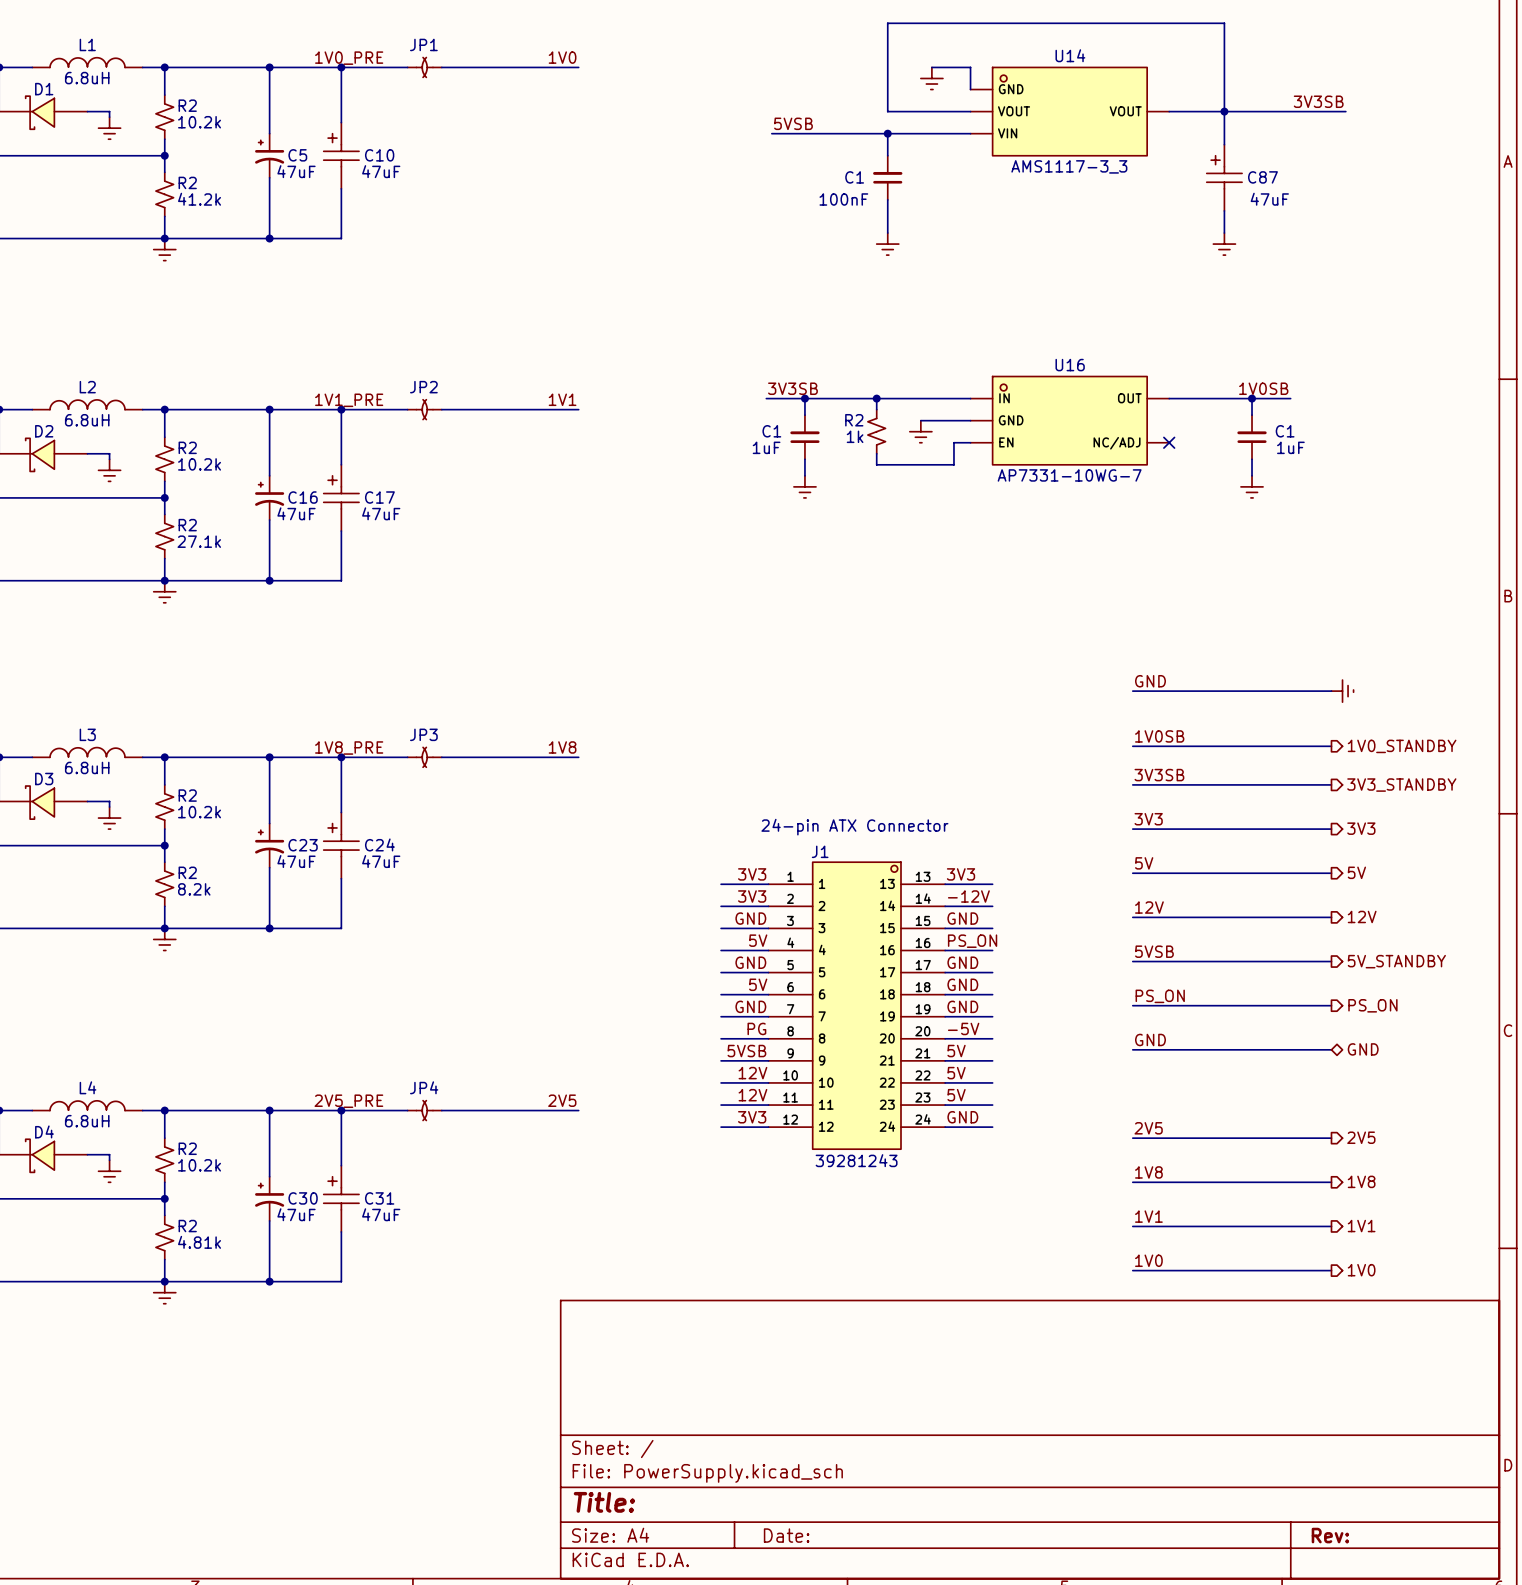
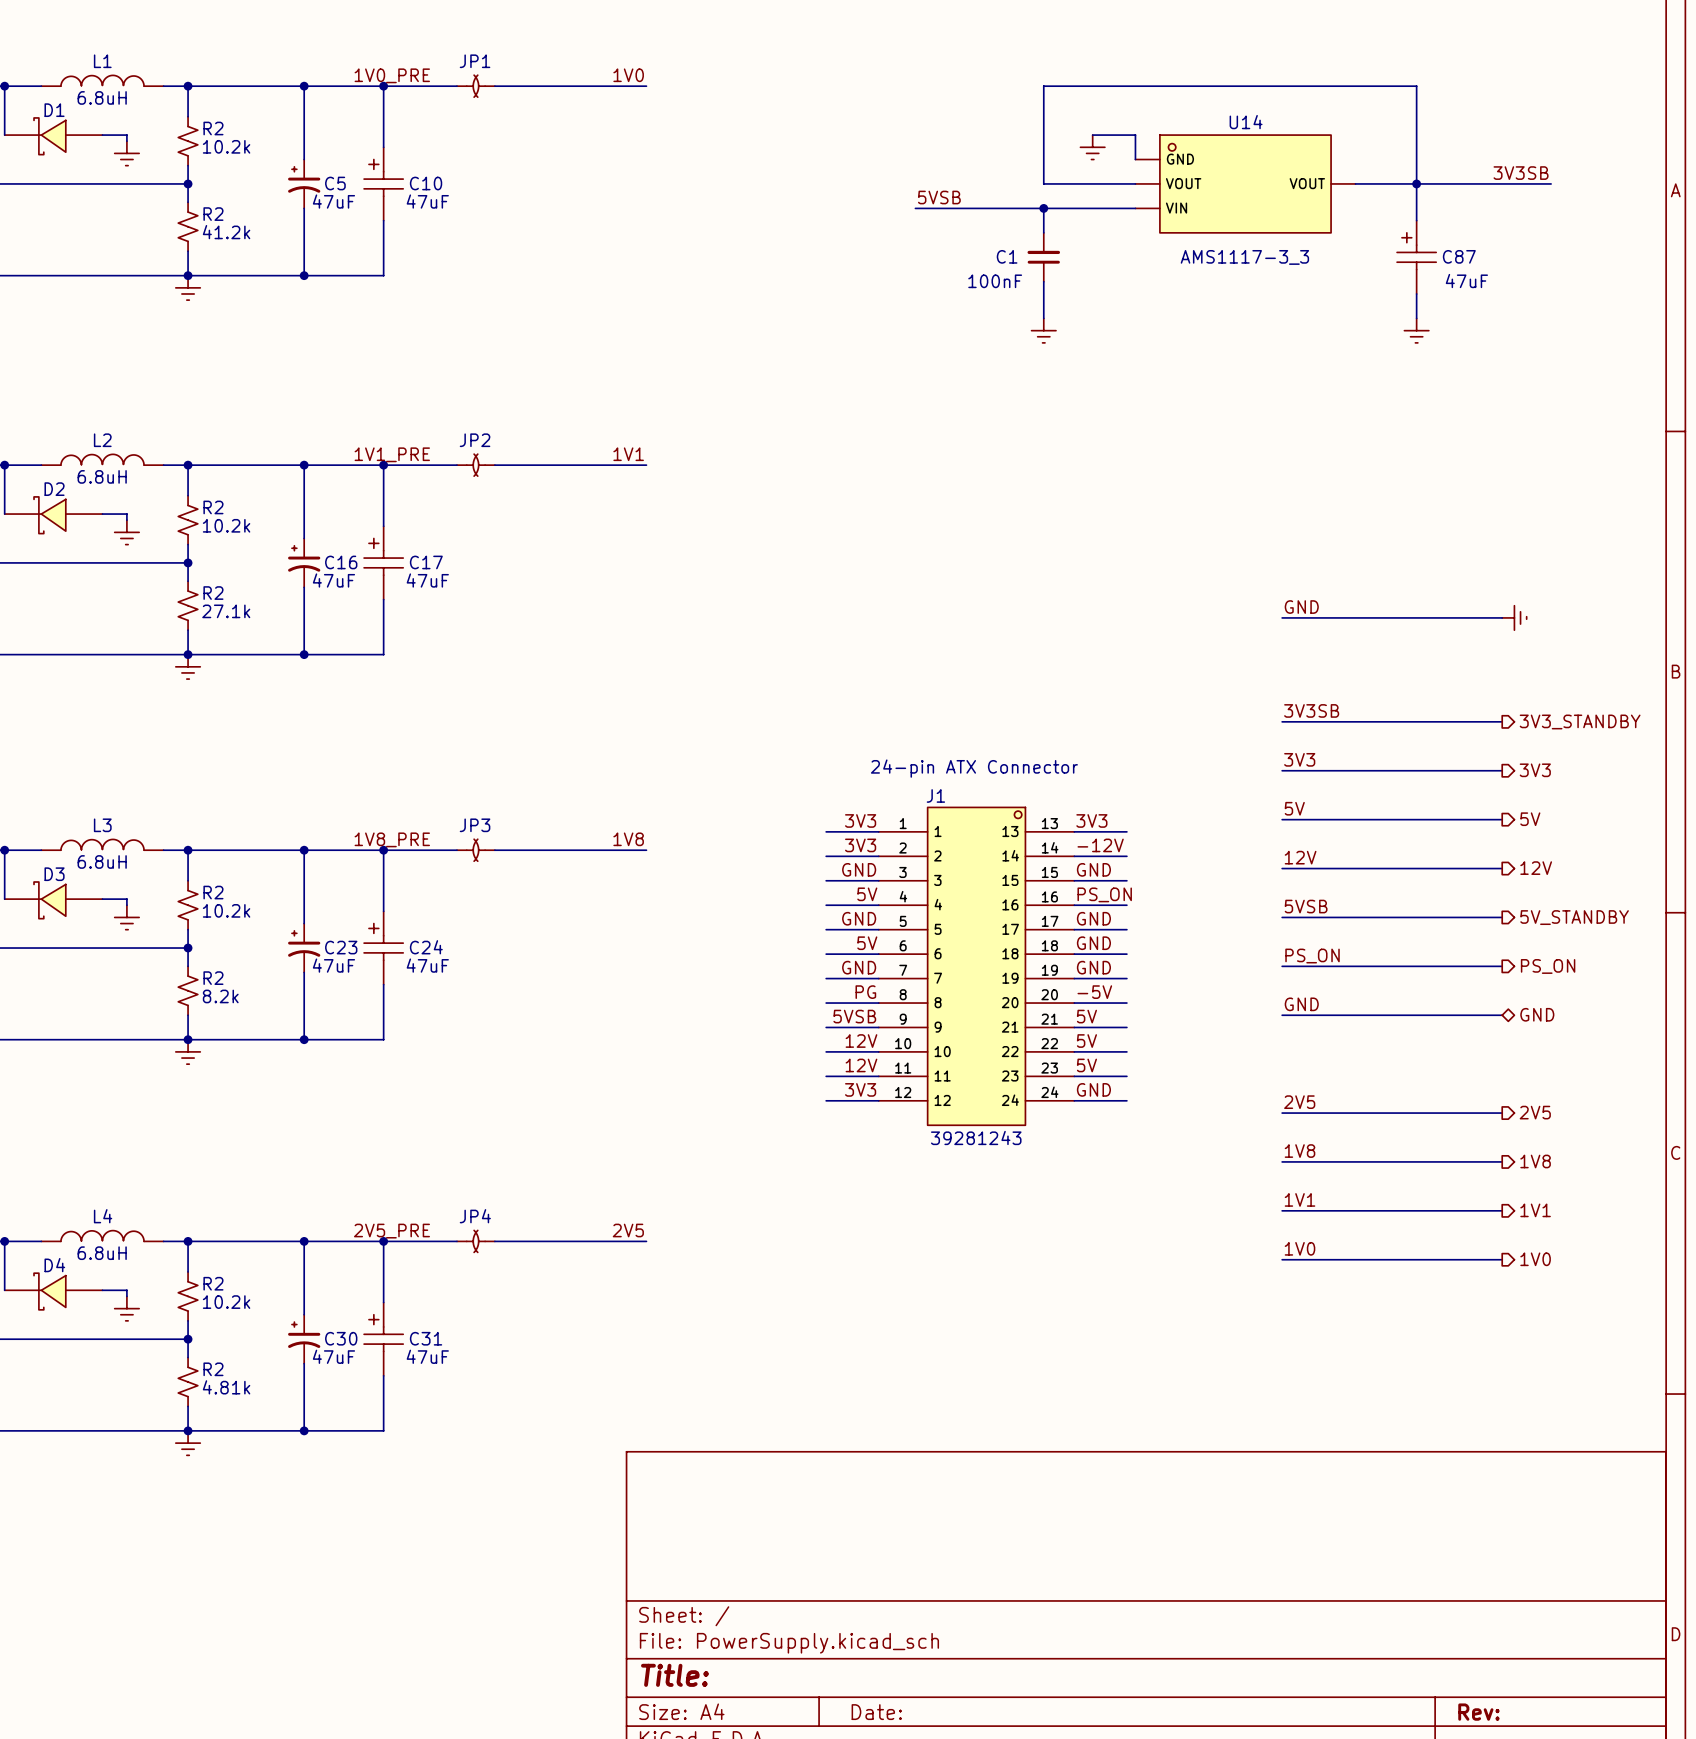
wire: (931, 67) (937, 67) -> (1135, 183) (1043, 183) (1043, 86)
wire: (970, 67) (970, 89) -> (1080, 86) (1416, 86) (1416, 220)
power symbol position: (931, 78) -> (1092, 147)
label position: 3V3SB (1318, 101) -> 3V3SB (1521, 173)
wire: (970, 111) (887, 111) (887, 23) (1224, 23) (1224, 144) -> none
U14 position: (1069, 111) -> (1245, 183)
wire: (1169, 111) (1345, 111) -> (1355, 183) (1551, 183)
junction: (1224, 111) -> none
label position: 5VSB (793, 123) -> 5VSB (939, 197)
wire: (771, 133) (970, 133) -> (915, 208) (1135, 208)
wire: (887, 133) (887, 155) -> (1043, 208) (1043, 232)
junction: (887, 133) -> none
junction: none -> (1416, 183)
U14 value position: AMS1117-3_3 (1069, 166) -> AMS1117-3_3 (1244, 257)
C1 position: (887, 177) -> (1043, 257)
junction: none -> (1043, 208)
C87 position: (1224, 177) -> (1416, 257)
wire: (887, 199) (887, 233) -> (1043, 281) (1043, 318)
wire: (1224, 210) (1224, 233) -> (1416, 293) (1416, 318)
power symbol position: (887, 244) -> (1043, 330)
power symbol position: (1224, 244) -> (1416, 330)
label: 3V3SB (792, 388) -> none
label: 1V0SB (1263, 388) -> none
wire: (766, 398) (970, 398) -> none
wire: (804, 398) (804, 415) -> none
junction: (804, 398) -> none
wire: (876, 398) (876, 409) -> none
junction: (876, 398) -> none
wire: (1169, 398) (1290, 398) -> none
wire: (1252, 398) (1252, 415) -> none
junction: (1252, 398) -> none
wire: (920, 420) (970, 420) -> none
U16: AP7331-10WG-7 (1069, 420) -> none
R2: 1k (876, 431) -> none
power symbol: (920, 431) -> none
C1: 1uF (804, 437) -> none
C1: 1uF (1252, 437) -> none
wire: (970, 442) (953, 442) (953, 464) (876, 464) (876, 453) -> none
no-connect mark: (1169, 442) -> none
wire: (804, 459) (804, 475) -> none
wire: (1252, 459) (1252, 475) -> none
power symbol: (804, 486) -> none
power symbol: (1252, 486) -> none
label: none -> GND (1301, 607)
power symbol: none -> (1514, 617)
label: none -> 3V3 (1299, 759)
label: GND (1150, 681) -> none
wire: (1132, 691) (1331, 691) -> (1282, 617) (1502, 617)
power symbol: (1342, 691) -> none
label: none -> 5V (1294, 808)
label: none -> 3V3 (860, 820)
label: none -> 3V3 (1091, 820)
label: 1V0SB (1159, 736) -> none
wire: (1132, 746) (1331, 746) -> none
hierarchical label: 1V0_STANDBY (1402, 746) -> none
label: none -> 3V3 (860, 845)
label: none -> GND (859, 869)
label: none -> GND (1093, 869)
label position: 3V3SB (1159, 775) -> 3V3SB (1311, 710)
wire: (1132, 784) (1331, 784) -> (1282, 721) (1502, 721)
hierarchical label position: 3V3_STANDBY (1401, 785) -> 3V3_STANDBY (1580, 721)
label: none -> 5V (867, 894)
label: none -> PS_ON (1104, 894)
label: none -> GND (859, 918)
label: none -> GND (1093, 918)
label: 3V3 (1148, 819) -> none
text position: 24-pin ATX Connector (854, 827) -> 24-pin ATX Connector (974, 768)
hierarchical label position: 3V3 (1361, 828) -> 3V3 (1535, 770)
wire: (1132, 829) (1331, 829) -> (1282, 770) (1502, 770)
label: none -> 5V (867, 943)
label: none -> GND (1093, 943)
label: none -> PS_ON (1312, 956)
label: none -> GND (859, 967)
label: none -> GND (1093, 967)
label: 5V (1144, 863) -> none
hierarchical label position: 5V (1356, 872) -> 5V (1530, 819)
wire: (1132, 873) (1331, 873) -> (1282, 819) (1502, 819)
label: 3V3 (752, 874) -> none
label: 3V3 (961, 874) -> none
wire: (721, 884) (768, 884) -> (826, 831) (878, 831)
wire: (945, 884) (992, 884) -> (1074, 831) (1126, 831)
label: 3V3 (752, 896) -> none
label position: -12V (968, 896) -> -12V (1100, 845)
label: none -> GND (1301, 1004)
wire: (721, 906) (768, 906) -> (826, 856) (878, 856)
wire: (945, 906) (992, 906) -> (1074, 856) (1126, 856)
label: none -> 5V (1086, 1016)
label position: 12V (1149, 907) -> 12V (1300, 857)
hierarchical label position: 12V (1362, 916) -> 12V (1536, 868)
wire: (1132, 917) (1331, 917) -> (1282, 868) (1502, 868)
label: GND (750, 918) -> none
label: GND (962, 918) -> none
wire: (721, 928) (768, 928) -> (826, 880) (878, 880)
wire: (945, 928) (992, 928) -> (1074, 880) (1126, 880)
label: none -> 12V (861, 1041)
label: none -> 5V (1086, 1041)
label: 5V (758, 940) -> none
label: PS_ON (972, 941) -> none
wire: (721, 950) (768, 950) -> (826, 905) (878, 905)
wire: (945, 950) (992, 950) -> (1074, 905) (1126, 905)
label: none -> 12V (861, 1065)
label: none -> 5V (1086, 1065)
label position: 5VSB (1154, 951) -> 5VSB (1306, 906)
wire: (1132, 961) (1331, 961) -> (1282, 917) (1502, 917)
hierarchical label position: 5V_STANDBY (1396, 961) -> 5V_STANDBY (1574, 917)
label: GND (750, 962) -> none
label: GND (962, 962) -> none
wire: (721, 972) (768, 972) -> (826, 929) (878, 929)
wire: (945, 972) (992, 972) -> (1074, 929) (1126, 929)
label: none -> 3V3 (860, 1089)
label: none -> GND (1093, 1089)
label: 5V (758, 984) -> none
label: GND (962, 984) -> none
wire: (721, 994) (768, 994) -> (826, 954) (878, 954)
wire: (945, 994) (992, 994) -> (1074, 954) (1126, 954)
label: PS_ON (1160, 996) -> none
J1 position: (856, 1005) -> (976, 966)
wire: (1132, 1005) (1331, 1005) -> (1282, 966) (1502, 966)
hierarchical label position: PS_ON (1372, 1005) -> PS_ON (1548, 966)
label: GND (750, 1006) -> none
label: GND (962, 1006) -> none
wire: (721, 1016) (768, 1016) -> (826, 978) (878, 978)
wire: (945, 1016) (992, 1016) -> (1074, 978) (1126, 978)
label position: PG (756, 1028) -> PG (865, 992)
label position: -5V (963, 1028) -> -5V (1094, 992)
wire: (721, 1038) (768, 1038) -> (826, 1003) (878, 1003)
wire: (945, 1038) (992, 1038) -> (1074, 1003) (1126, 1003)
label: GND (1150, 1039) -> none
wire: (1132, 1049) (1331, 1049) -> (1282, 1015) (1502, 1015)
hierarchical label position: GND (1363, 1049) -> GND (1537, 1014)
label position: 5VSB (746, 1051) -> 5VSB (854, 1016)
label: 5V (956, 1051) -> none
wire: (721, 1060) (768, 1060) -> (826, 1027) (878, 1027)
wire: (945, 1060) (992, 1060) -> (1074, 1027) (1126, 1027)
label: 12V (752, 1073) -> none
label: 5V (956, 1073) -> none
wire: (721, 1082) (768, 1082) -> (826, 1051) (878, 1051)
wire: (945, 1082) (992, 1082) -> (1074, 1051) (1126, 1051)
label: 12V (752, 1095) -> none
label: 5V (956, 1095) -> none
wire: (721, 1105) (768, 1105) -> (826, 1076) (878, 1076)
wire: (945, 1105) (992, 1105) -> (1074, 1076) (1126, 1076)
label: 3V3 (752, 1117) -> none
label: GND (962, 1117) -> none
wire: (721, 1127) (768, 1127) -> (826, 1100) (878, 1100)
wire: (945, 1127) (992, 1127) -> (1074, 1100) (1126, 1100)
label position: 2V5 (1148, 1128) -> 2V5 (1299, 1102)
hierarchical label position: 2V5 (1361, 1137) -> 2V5 (1535, 1112)
wire: (1132, 1138) (1331, 1138) -> (1282, 1113) (1502, 1113)
label position: 1V8 (1148, 1172) -> 1V8 (1300, 1151)
hierarchical label position: 1V8 (1361, 1181) -> 1V8 (1535, 1161)
wire: (1132, 1182) (1331, 1182) -> (1282, 1161) (1502, 1161)
label position: 1V1 (1148, 1216) -> 1V1 (1300, 1199)
wire: (1132, 1226) (1331, 1226) -> (1282, 1210) (1502, 1210)
hierarchical label position: 1V1 (1361, 1226) -> 1V1 (1535, 1210)
label position: 1V0 (1148, 1260) -> 1V0 (1300, 1248)
wire: (1132, 1270) (1331, 1270) -> (1282, 1259) (1502, 1259)
hierarchical label position: 1V0 (1361, 1270) -> 1V0 (1535, 1259)

